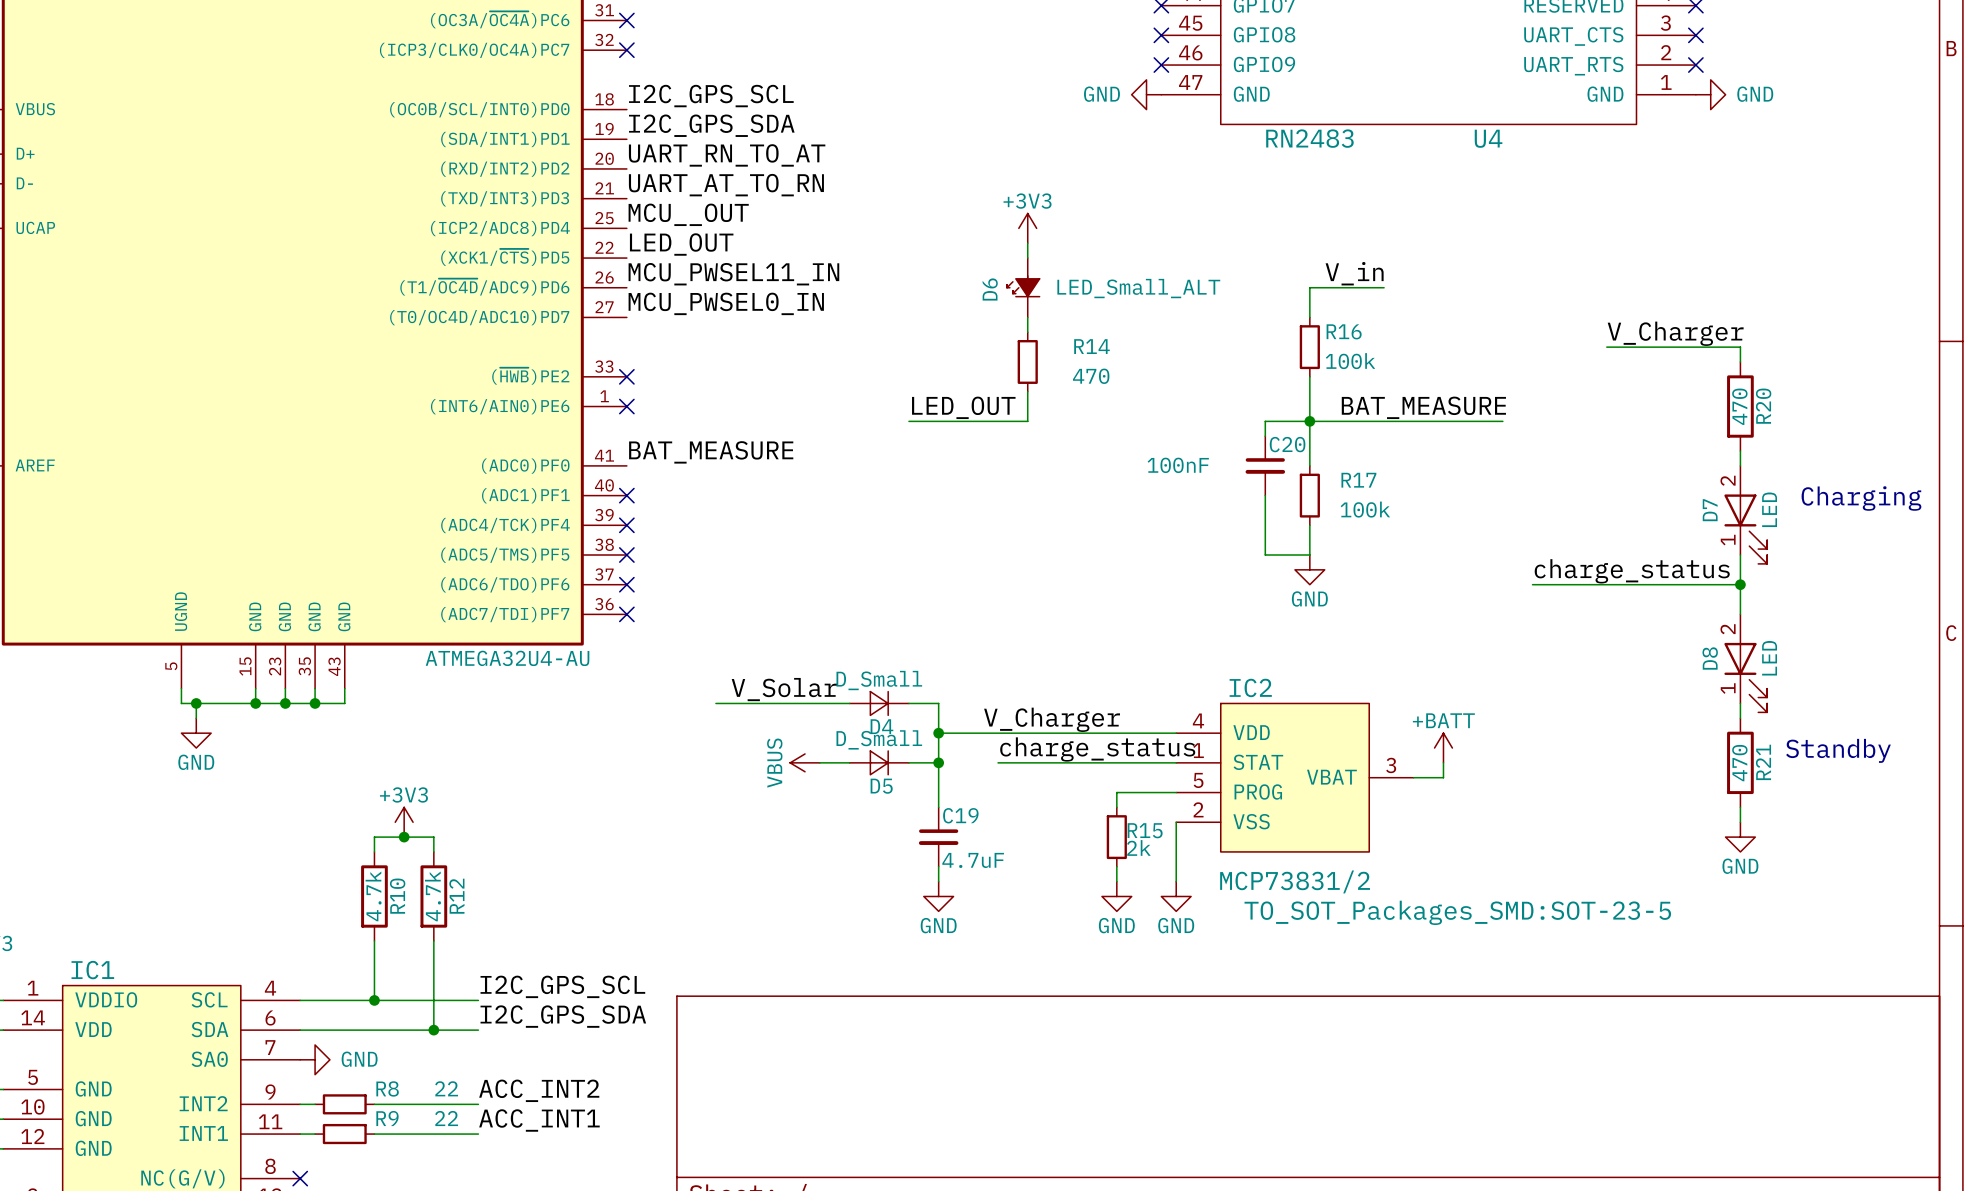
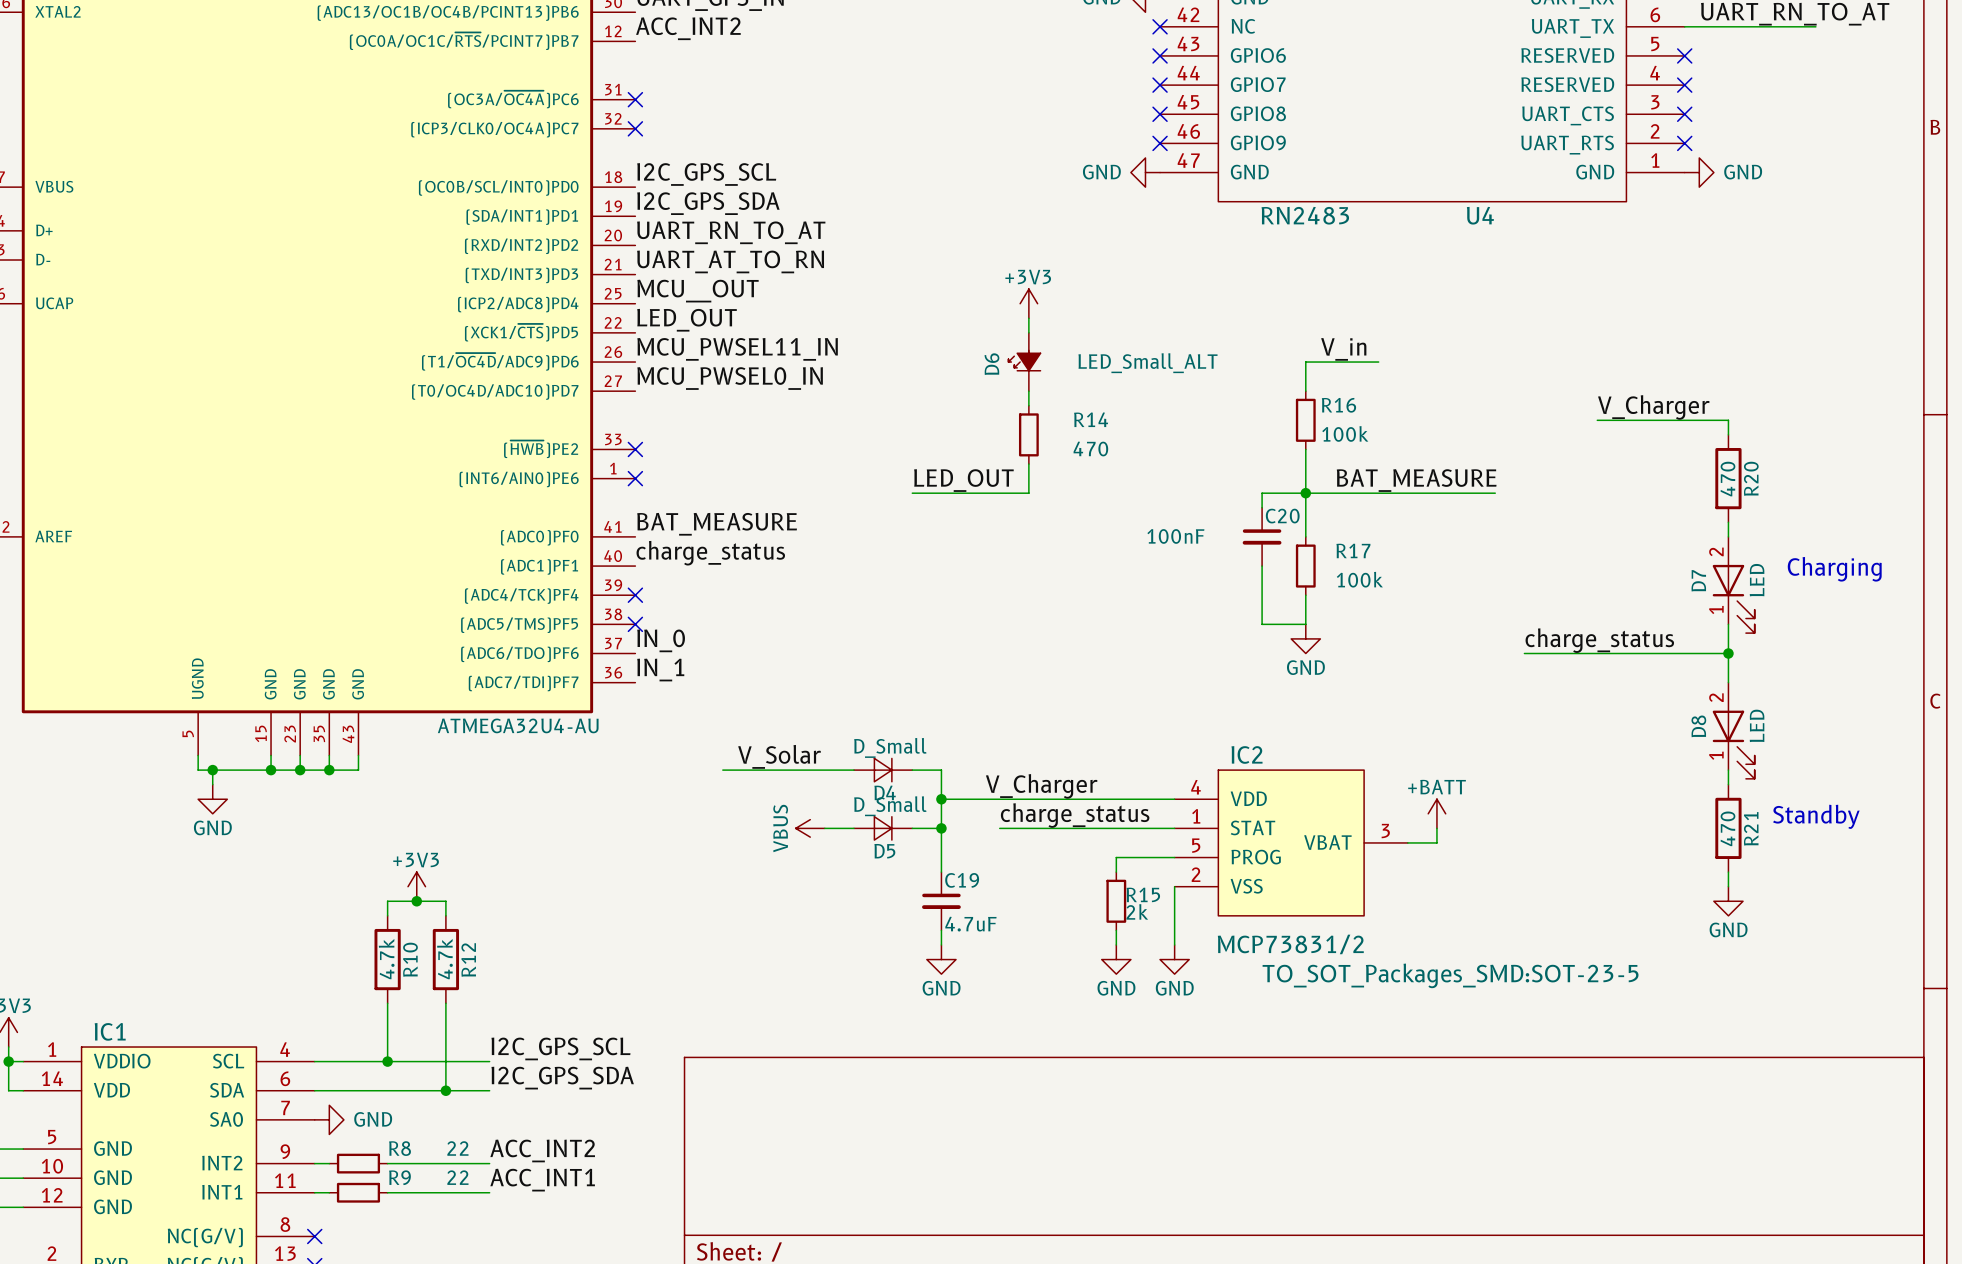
label: none -> charge_status (710, 553)
no-connect mark: (626, 495) -> none
label: none -> IN_0 (661, 640)
no-connect mark: (626, 584) -> none
label: none -> IN_1 (660, 670)
no-connect mark: (626, 614) -> none

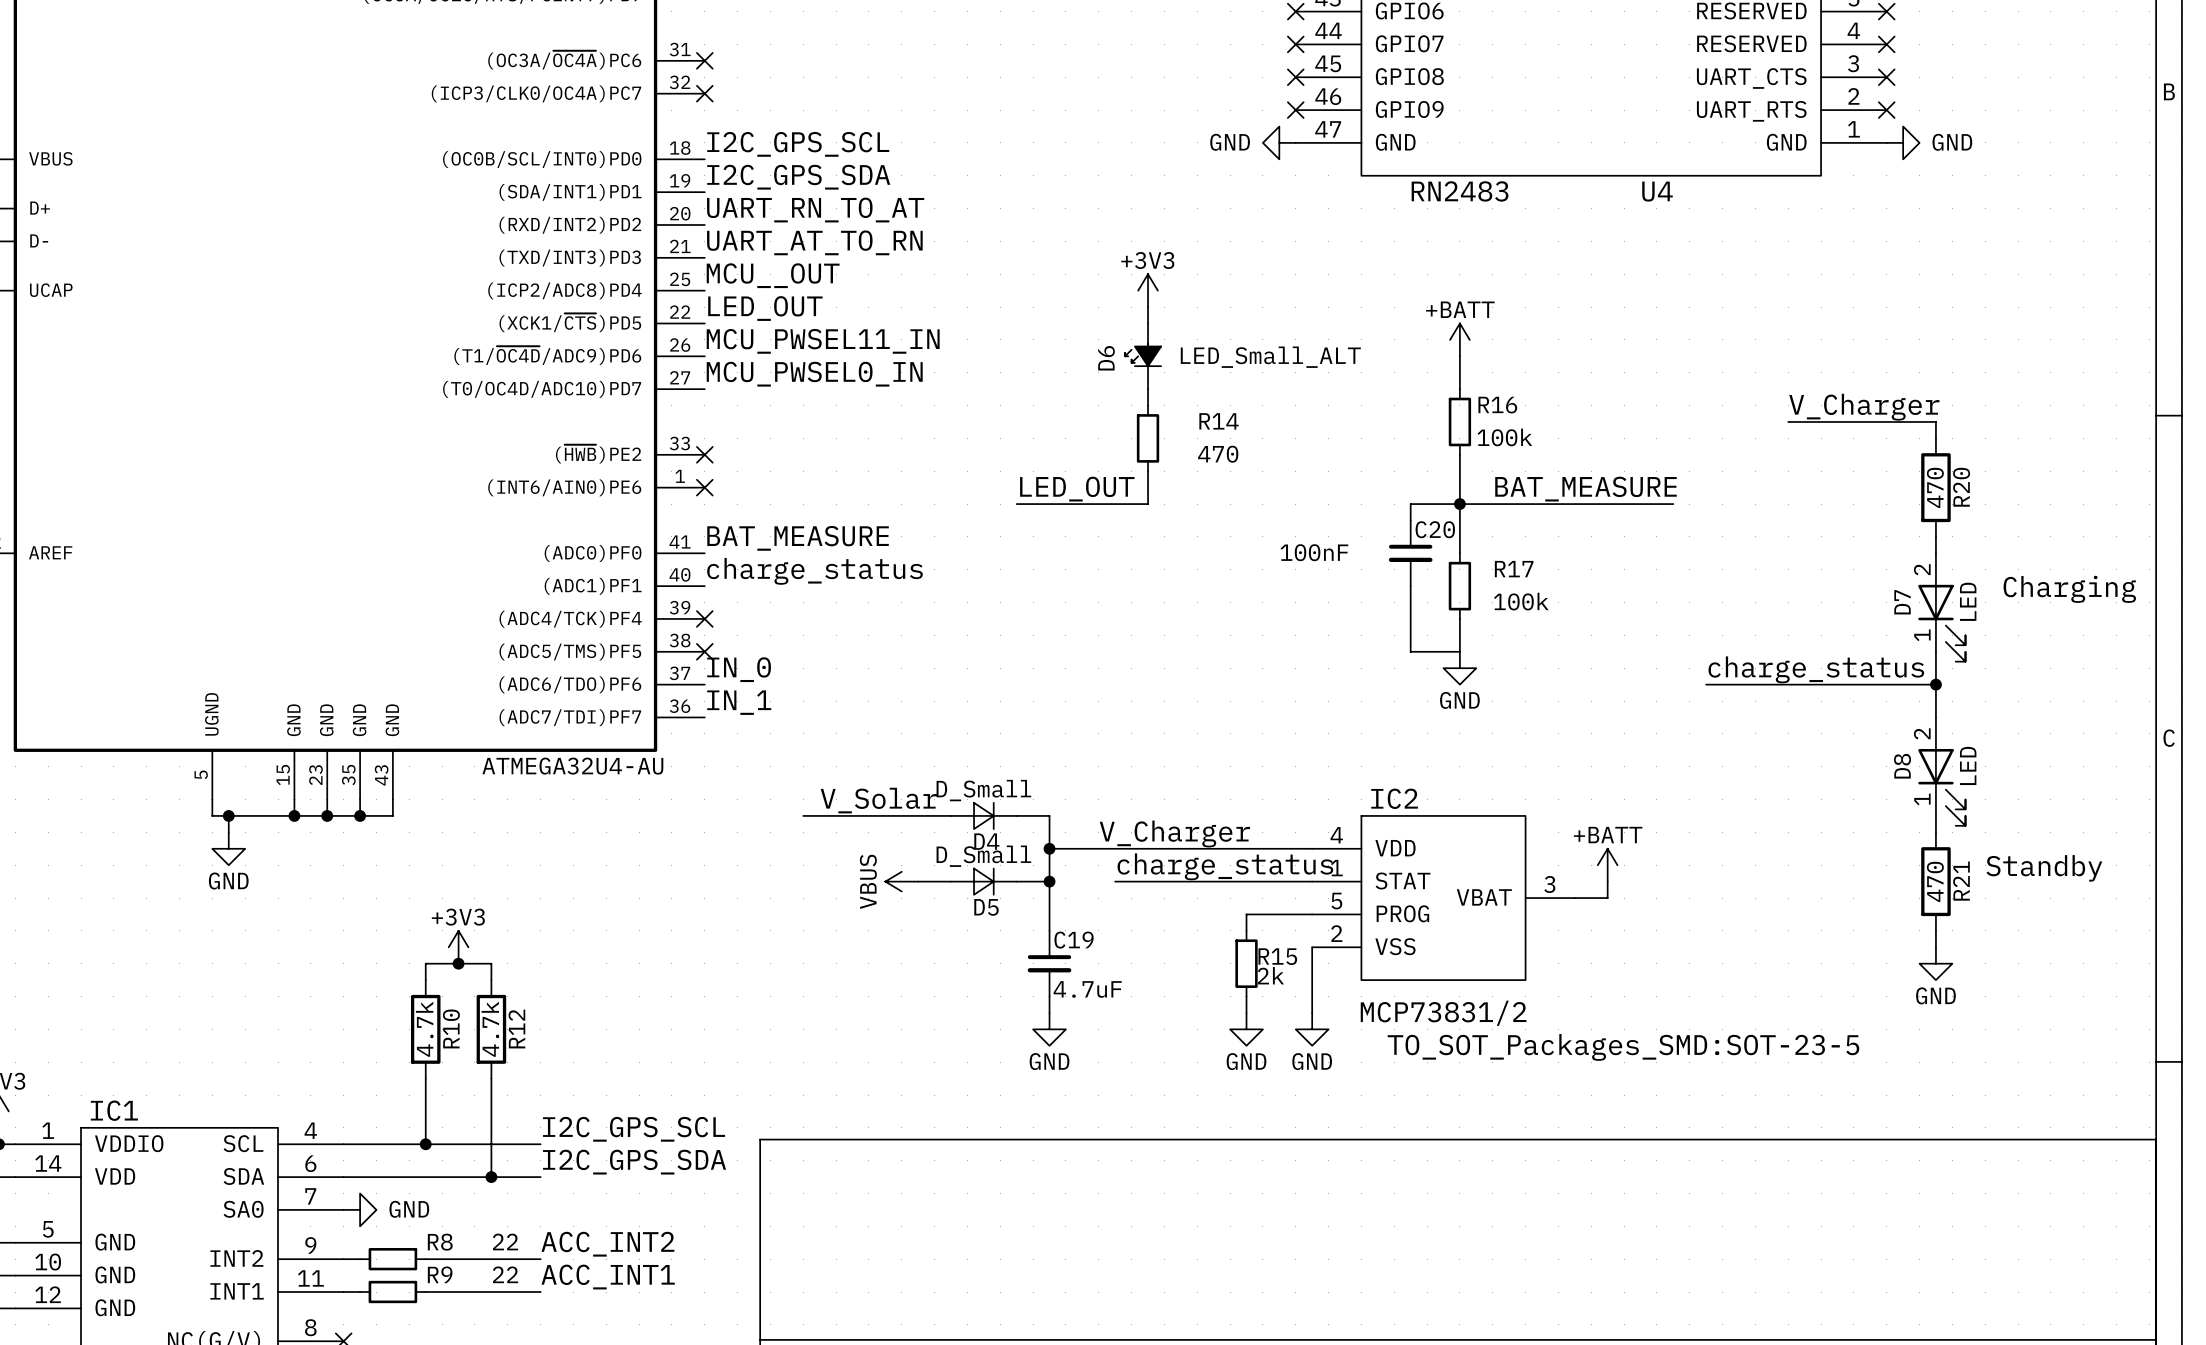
power symbol: none -> +BATT (1459, 339)
label: V_in (1343, 349) -> none
wire: (1305, 362) (1378, 362) -> none

